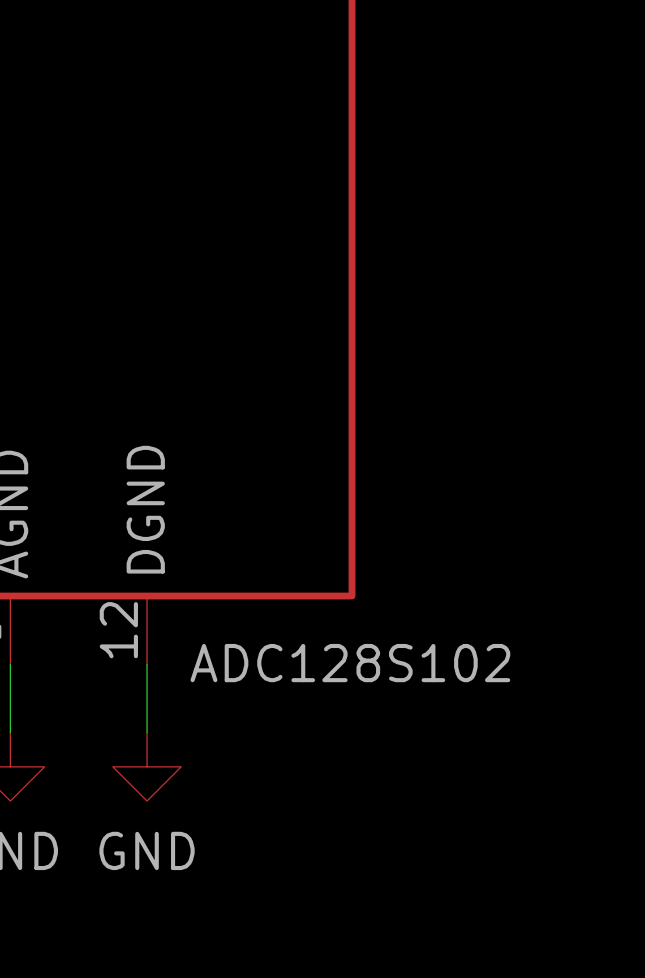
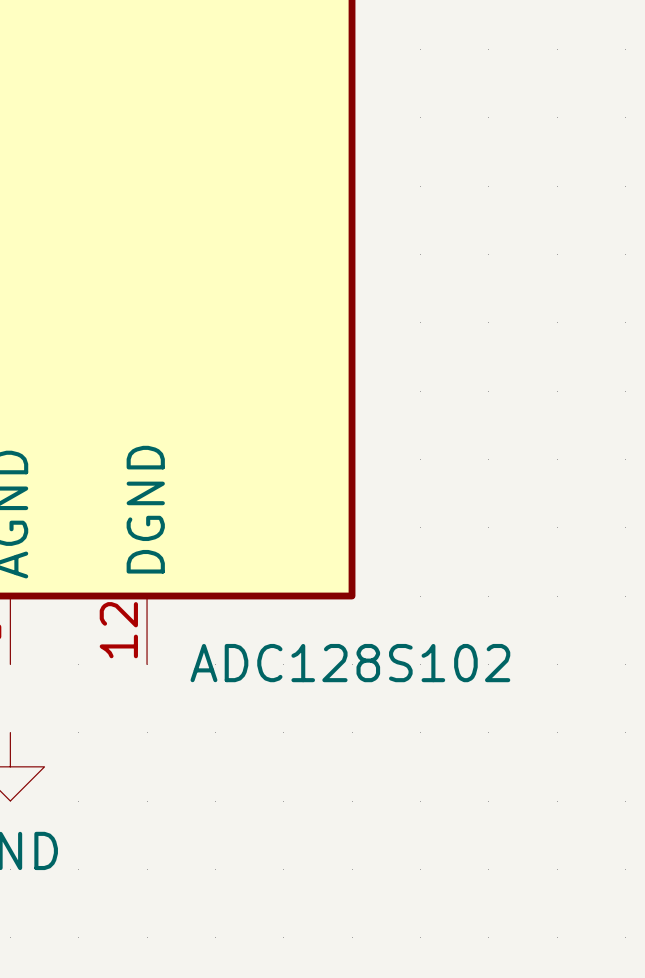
wire: (10, 664) (10, 732) -> none
wire: (147, 664) (147, 732) -> none
power symbol: GND (147, 766) -> none

